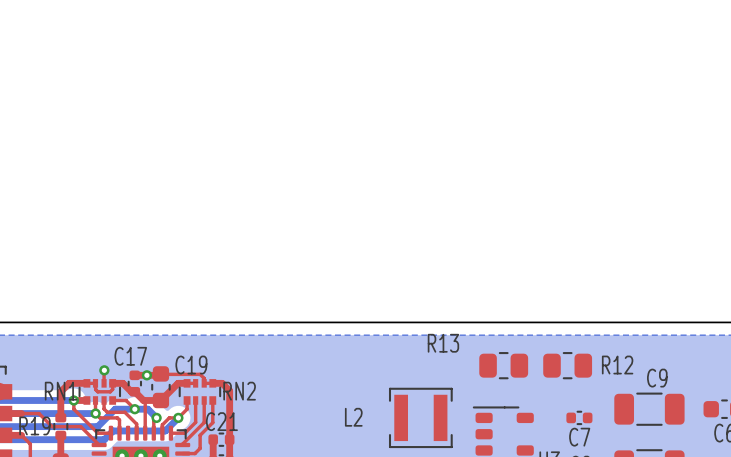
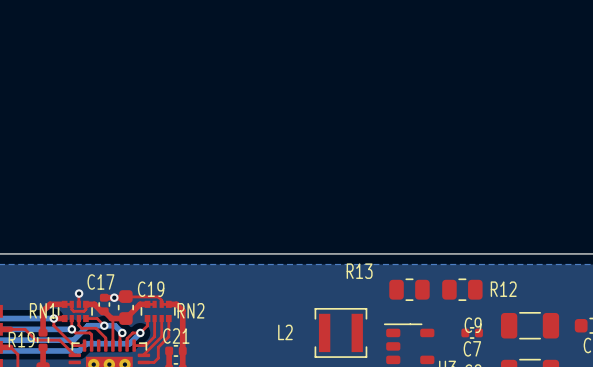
C9 name position: C9 (657, 378) -> C9 (473, 325)

